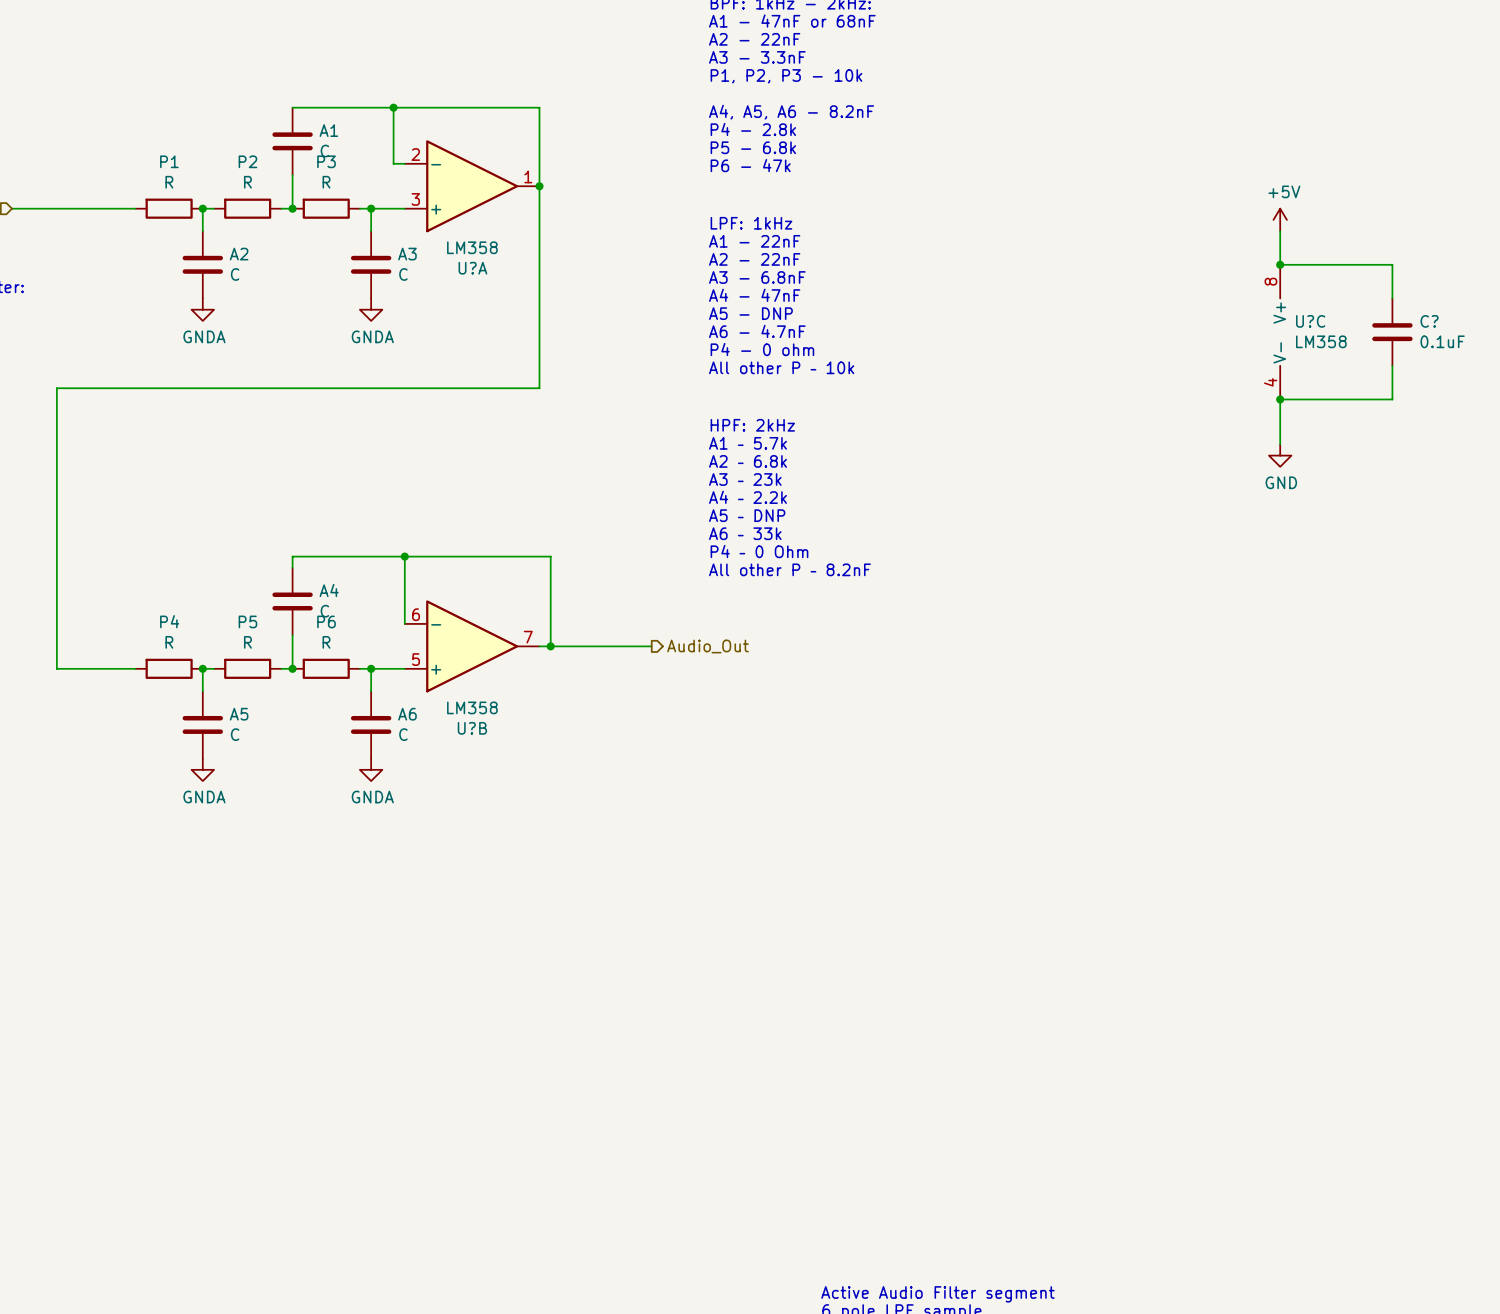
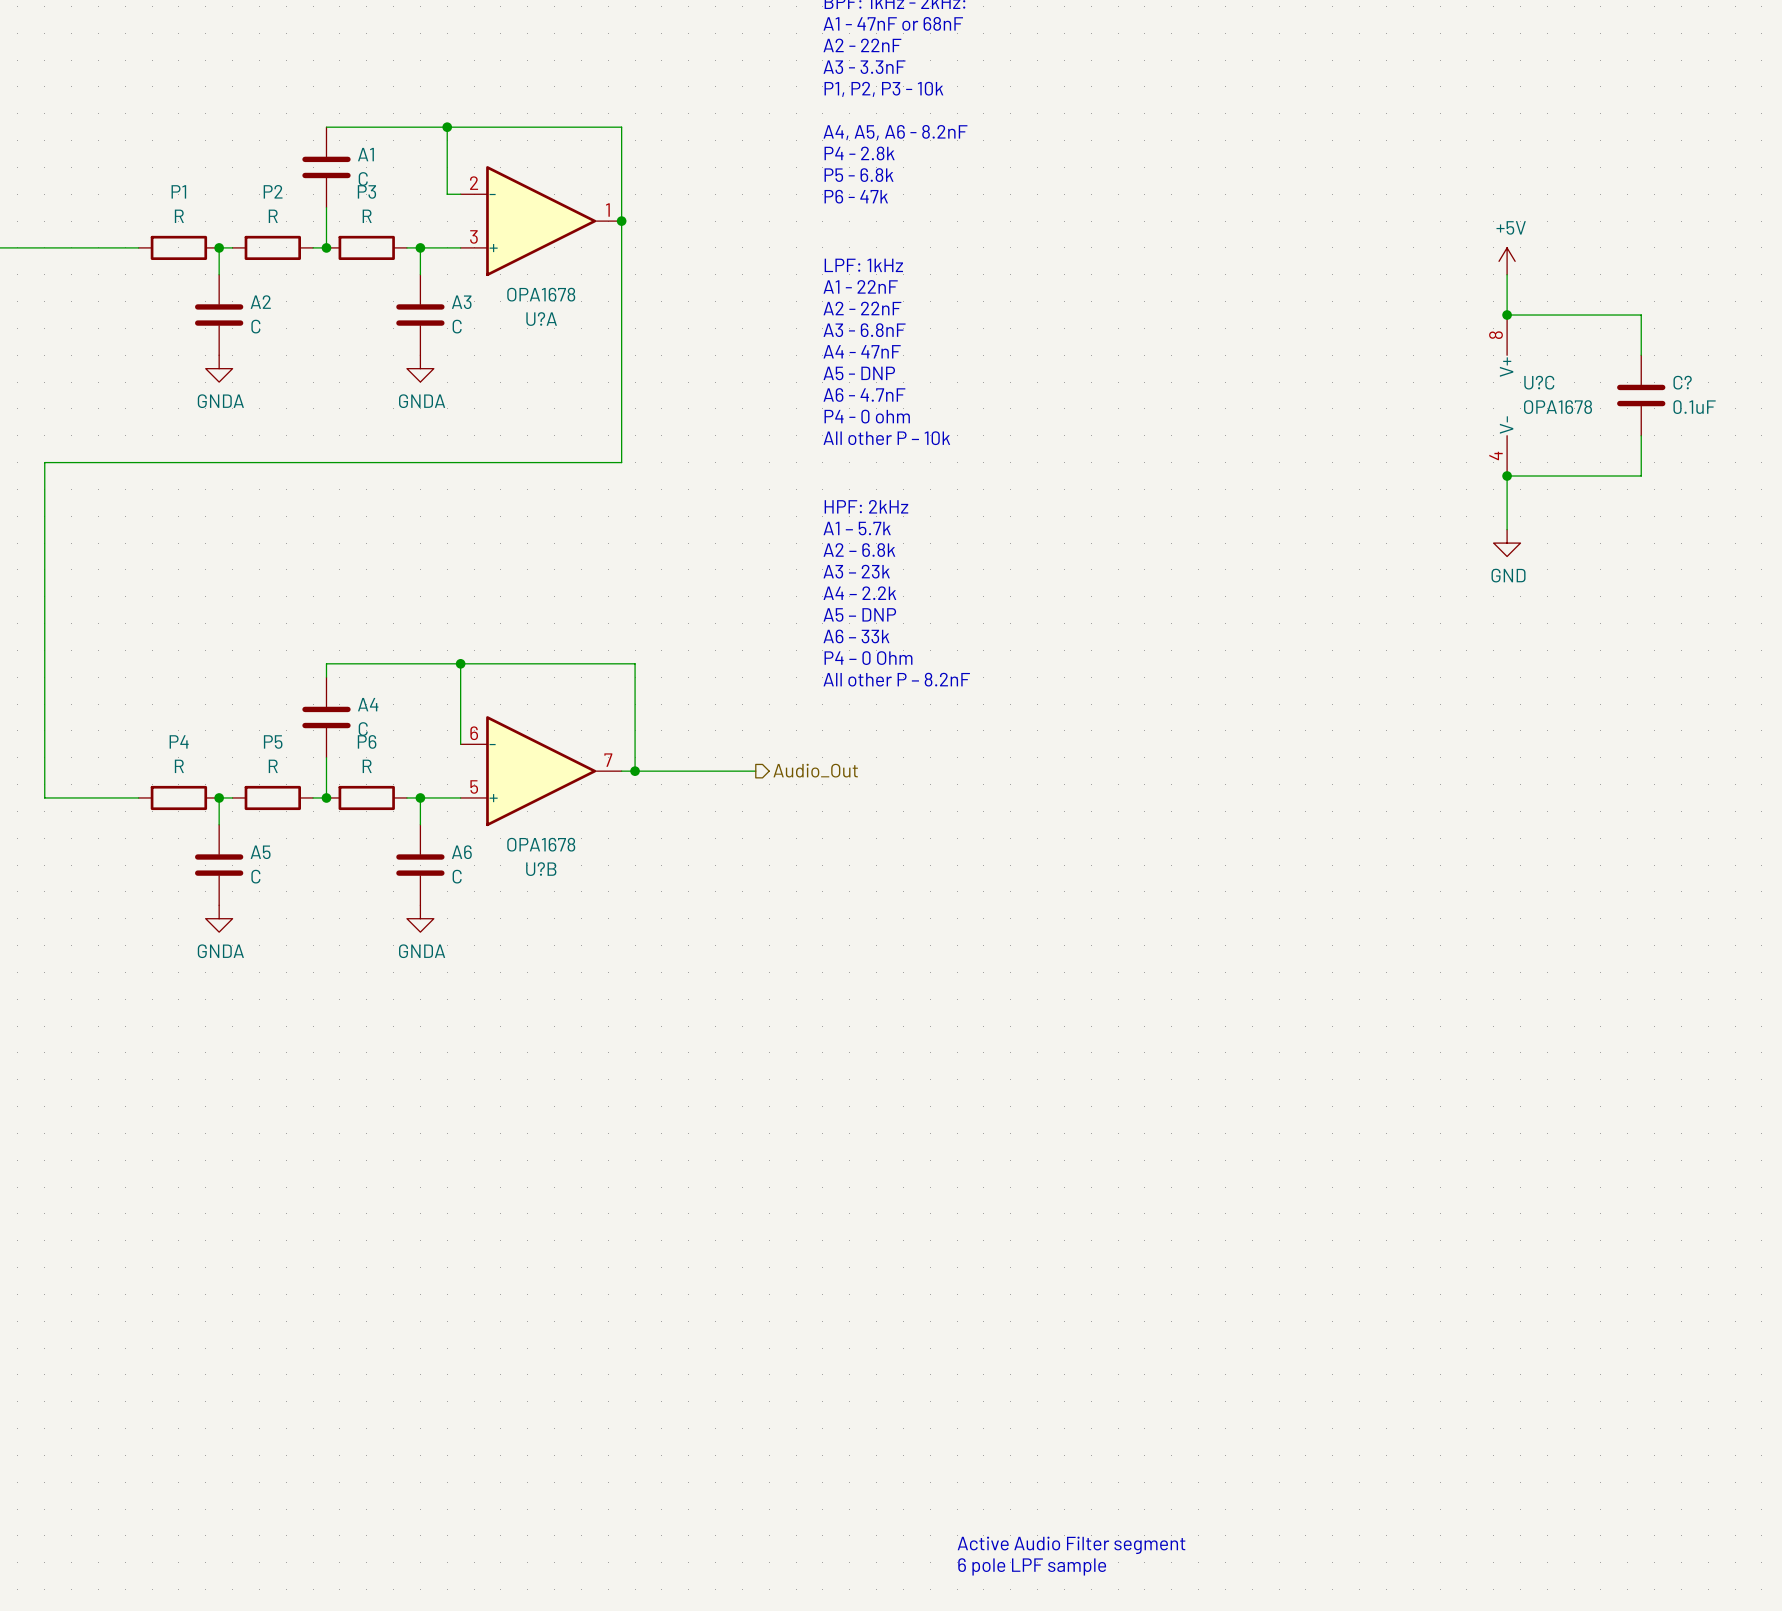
U?A value: LM358 (472, 247) -> OPA1678 (541, 294)
U?C value: LM358 (1321, 341) -> OPA1678 (1558, 407)
U?B value: LM358 (472, 707) -> OPA1678 (541, 844)

